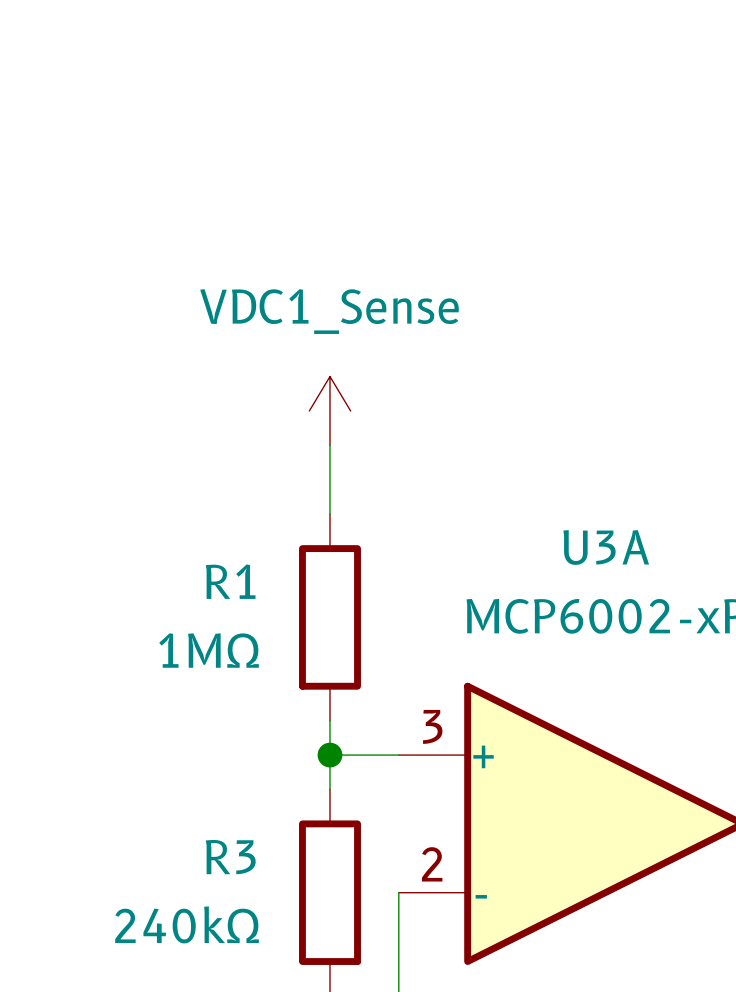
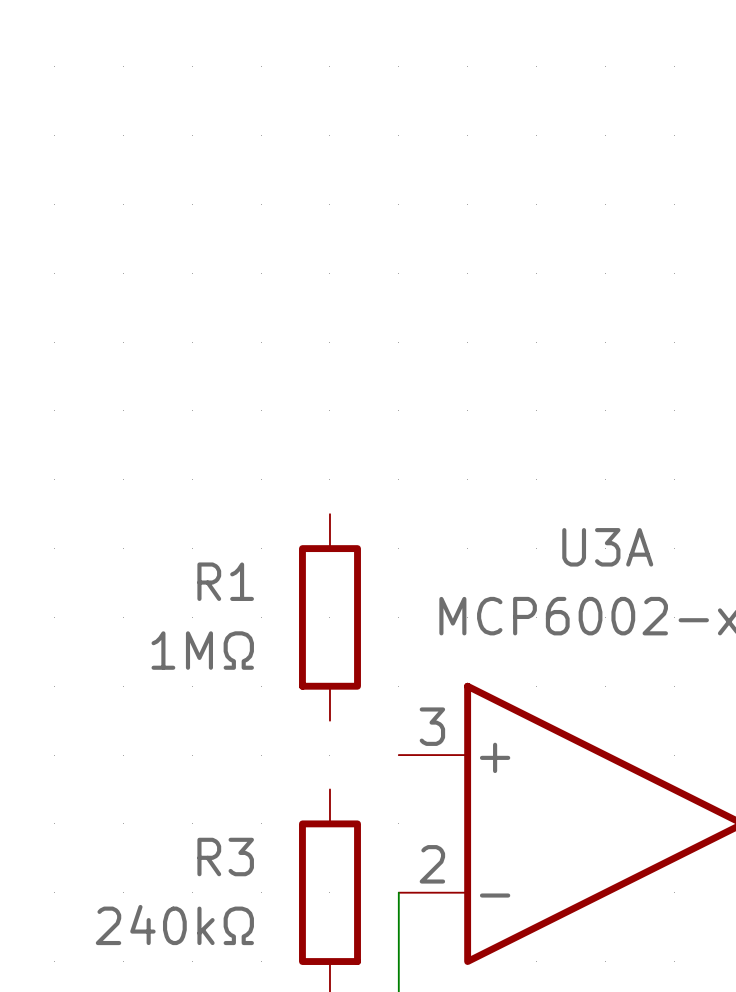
power symbol: VDC1_Sense (329, 410) -> none
wire: (329, 445) (329, 514) -> none
wire: (329, 720) (329, 789) -> none
wire: (329, 755) (398, 755) -> none
junction: (329, 755) -> none

